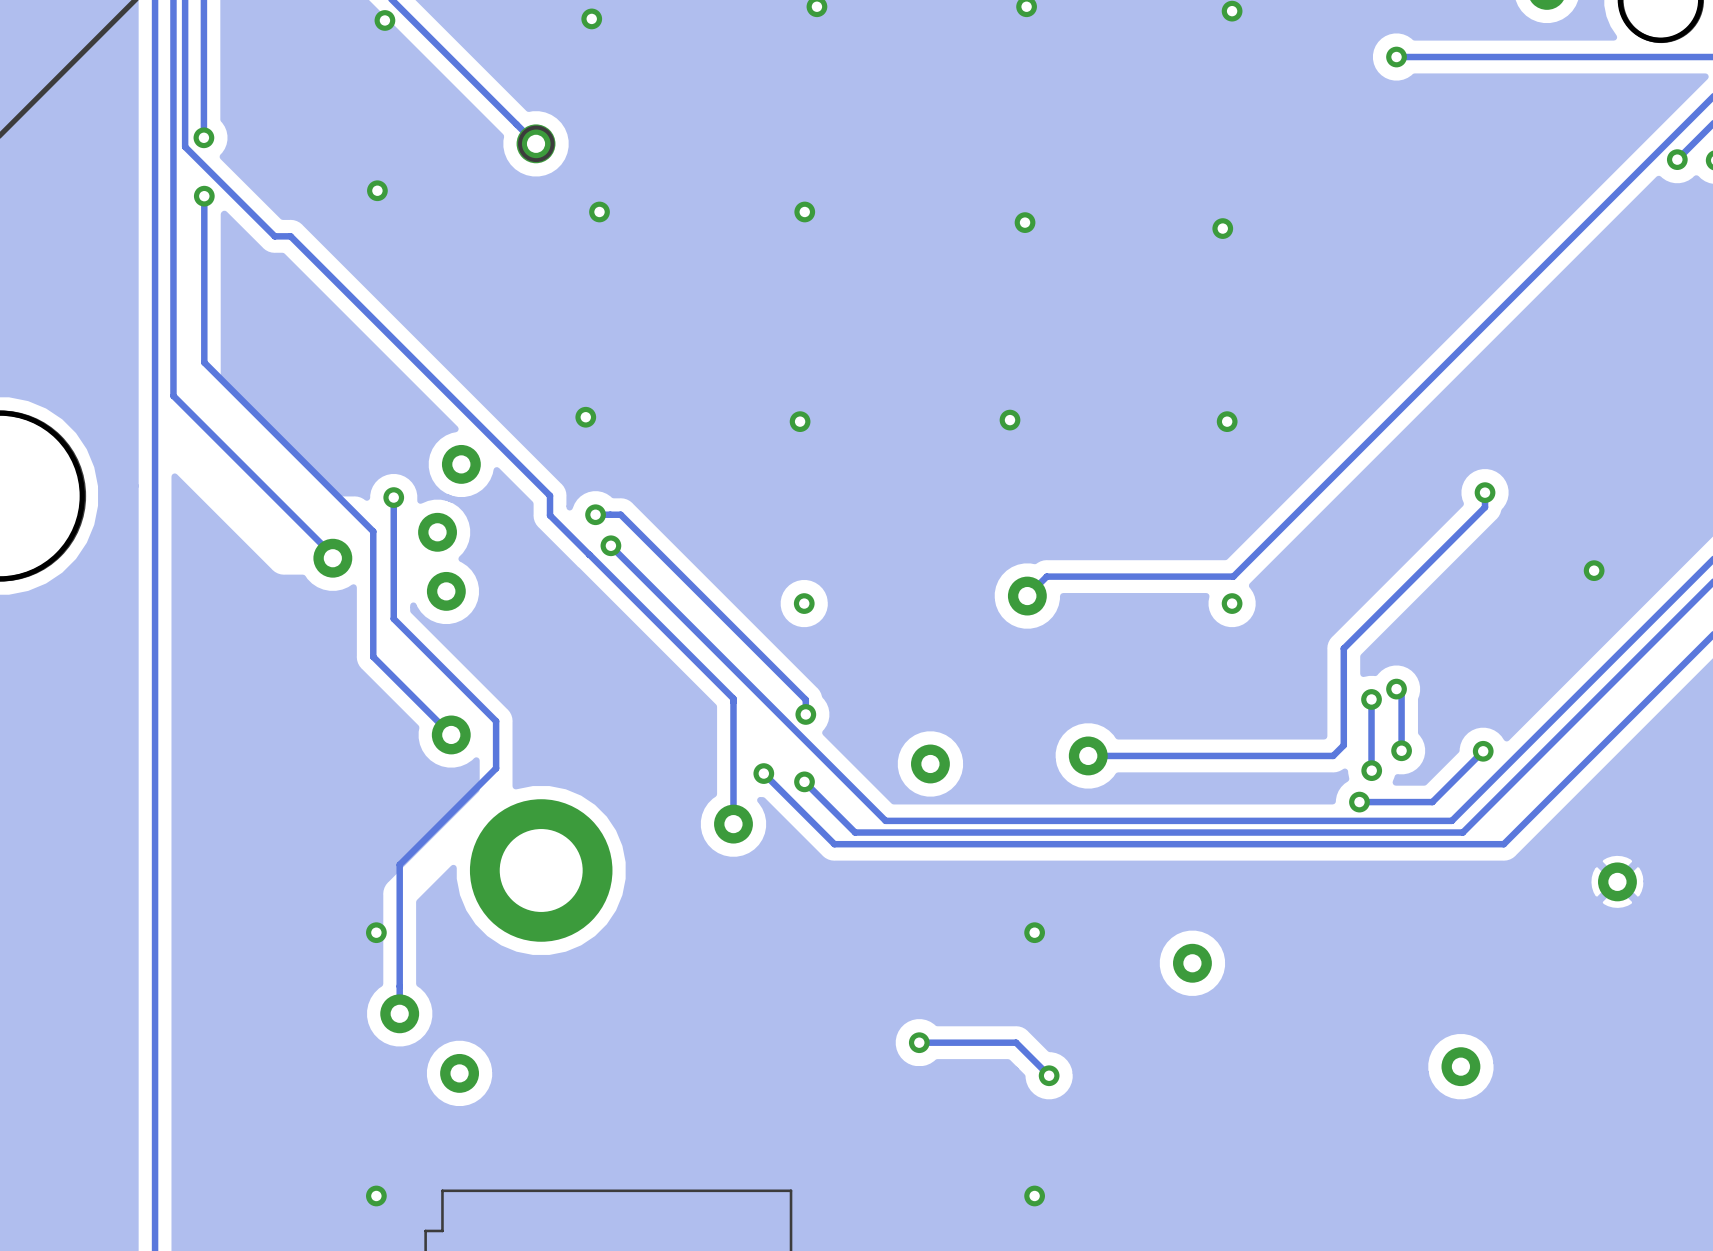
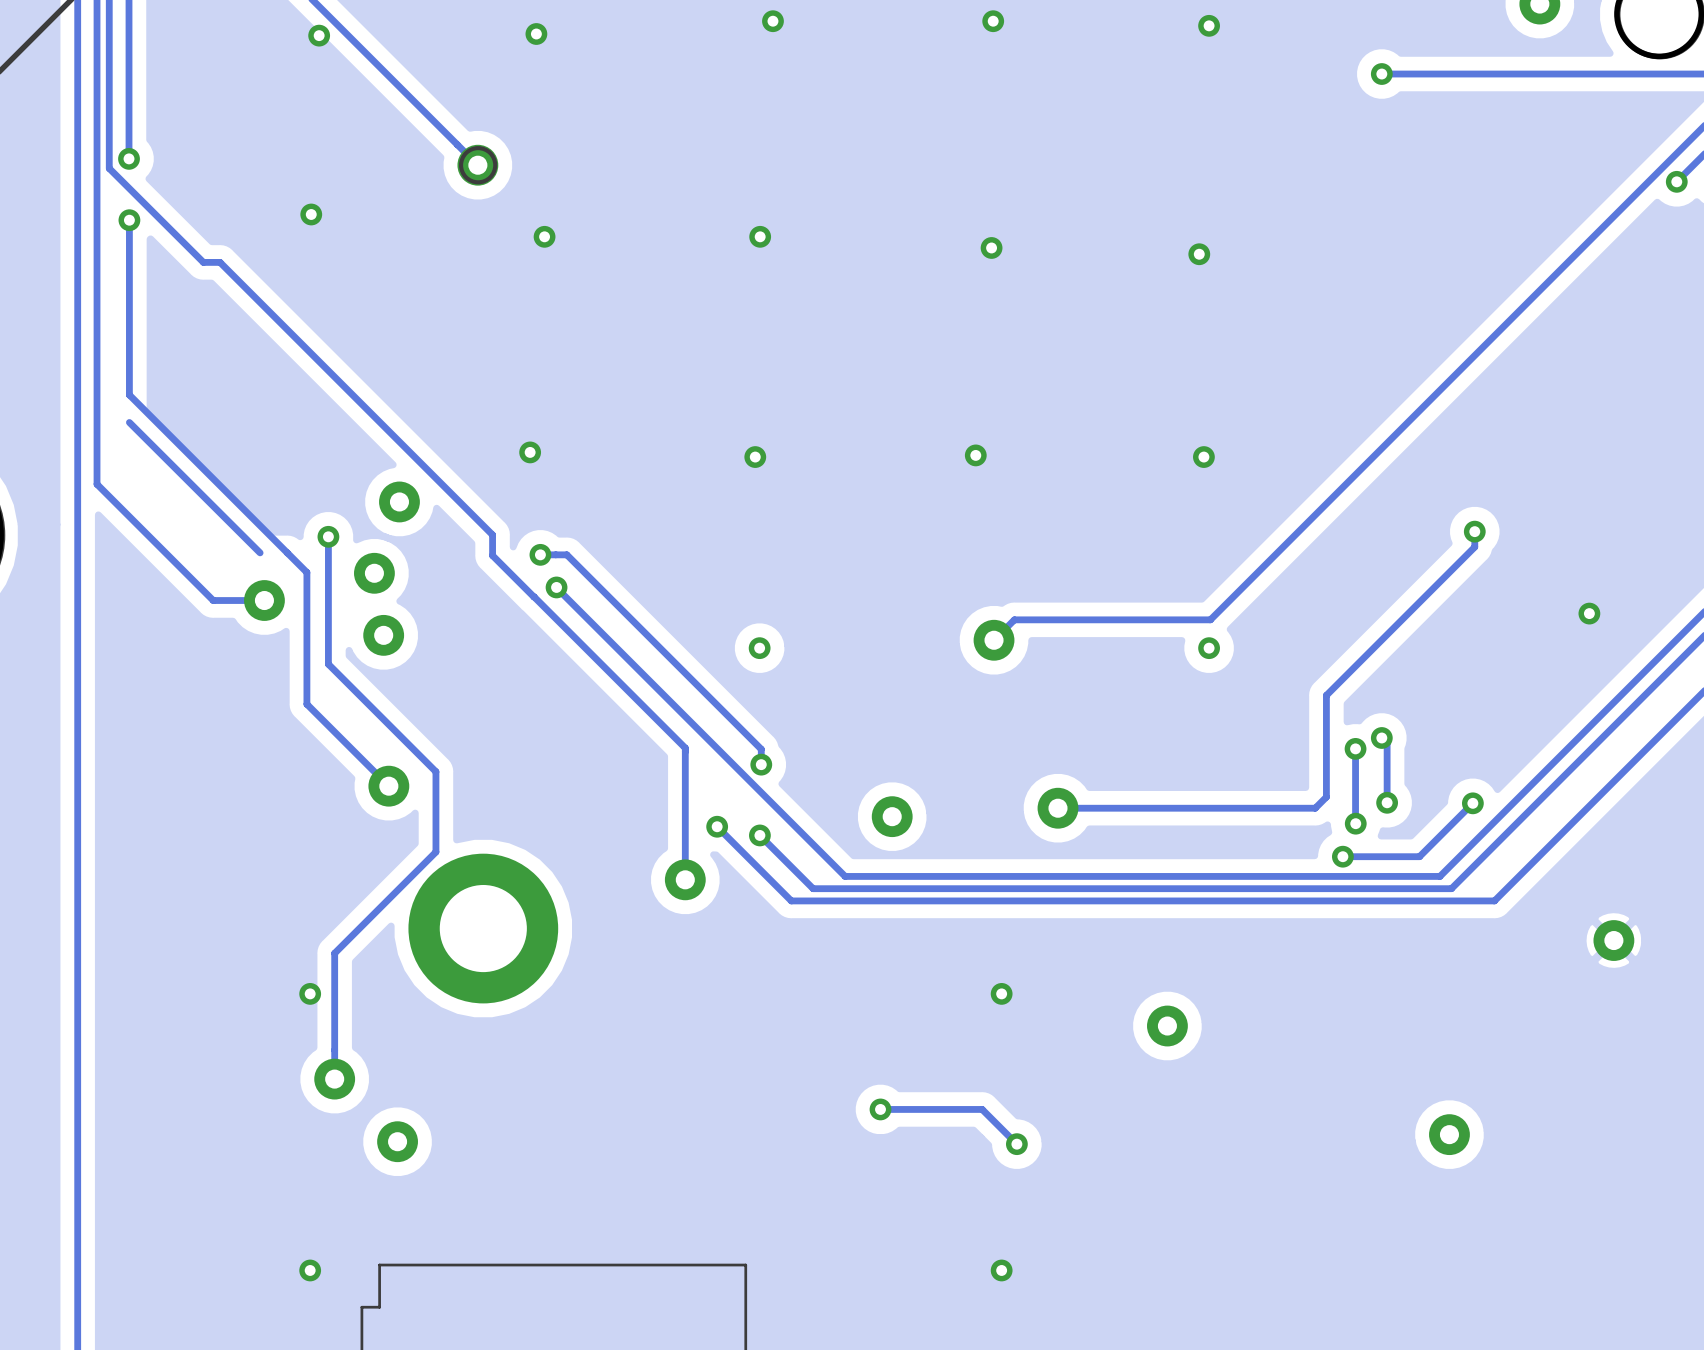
track: none -> (129, 422) (260, 552)
track: (173, 395) (332, 555) (332, 558) -> (97, 430) (97, 484) (213, 600) (264, 600)
track: (496, 768) (399, 864) (399, 894) -> (435, 821) (435, 852) (334, 953)

